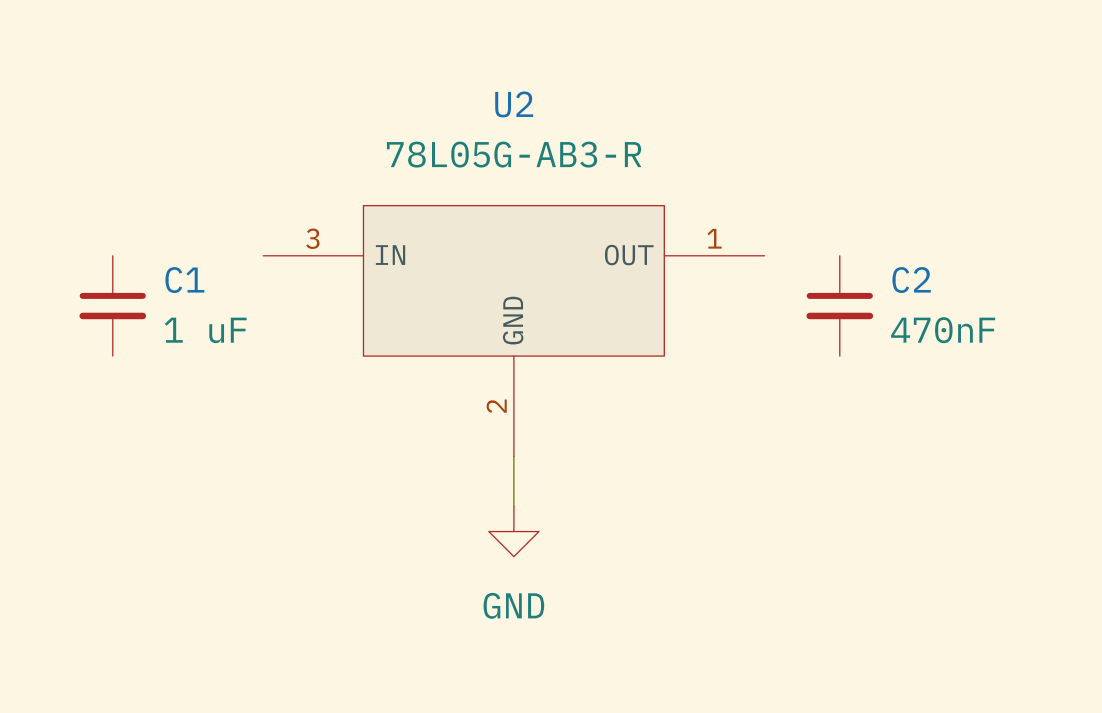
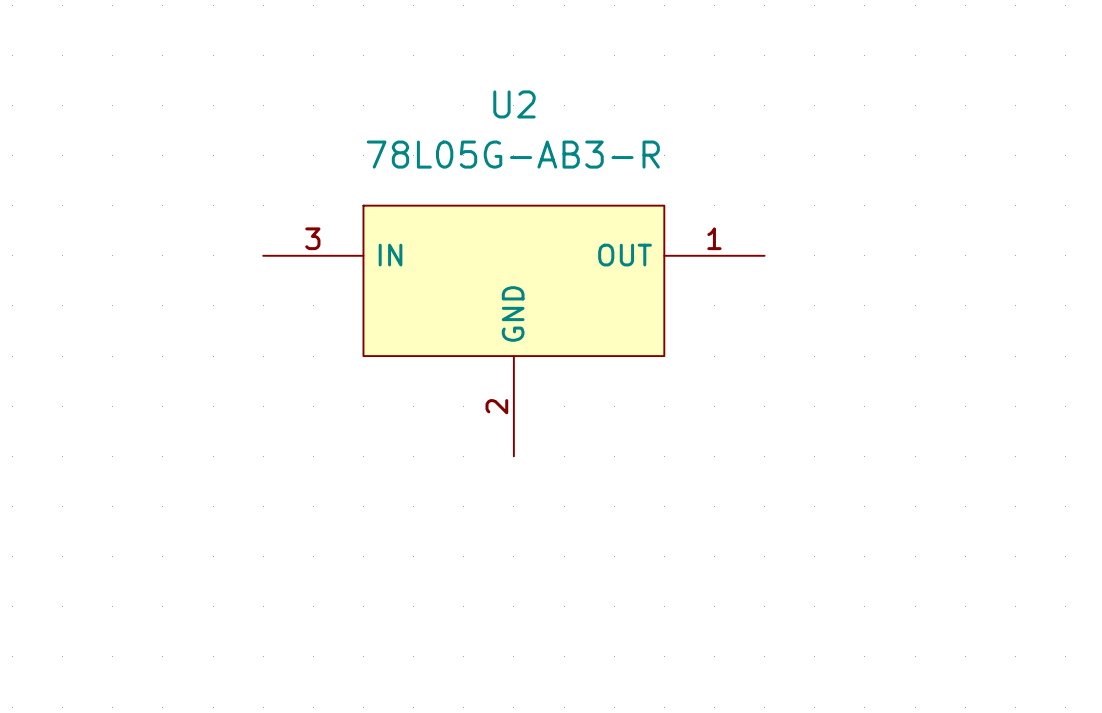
C1: 1 uF (112, 305) -> none
C2: 470nF (839, 305) -> none
wire: (513, 456) (513, 506) -> none
power symbol: GND (513, 531) -> none

